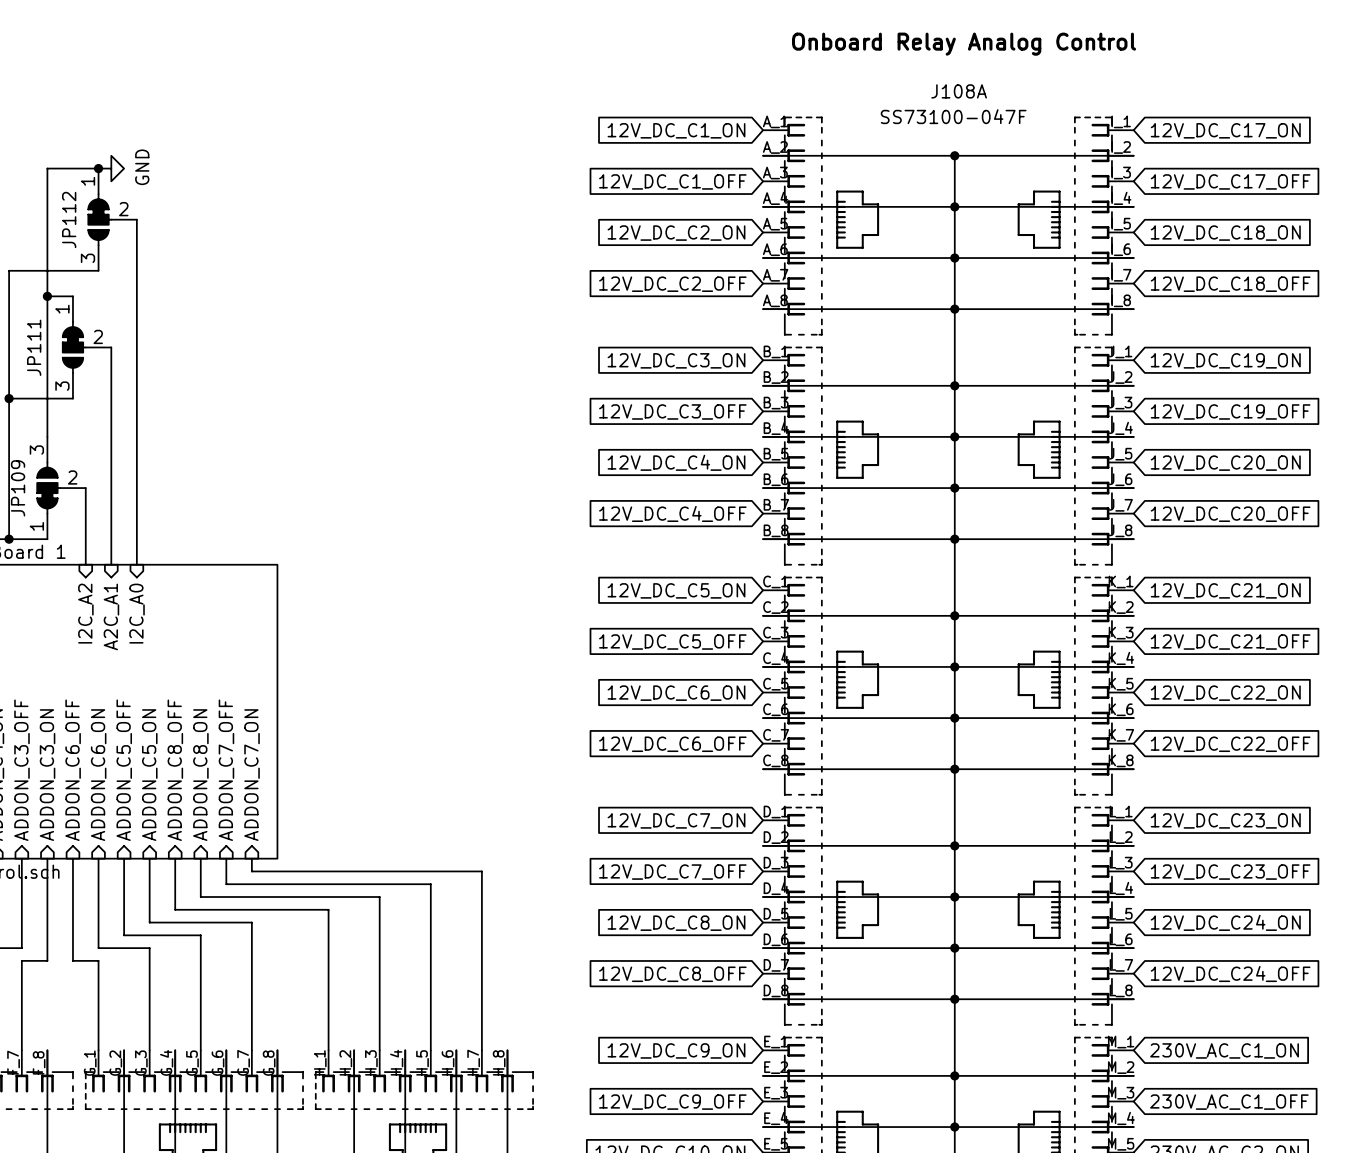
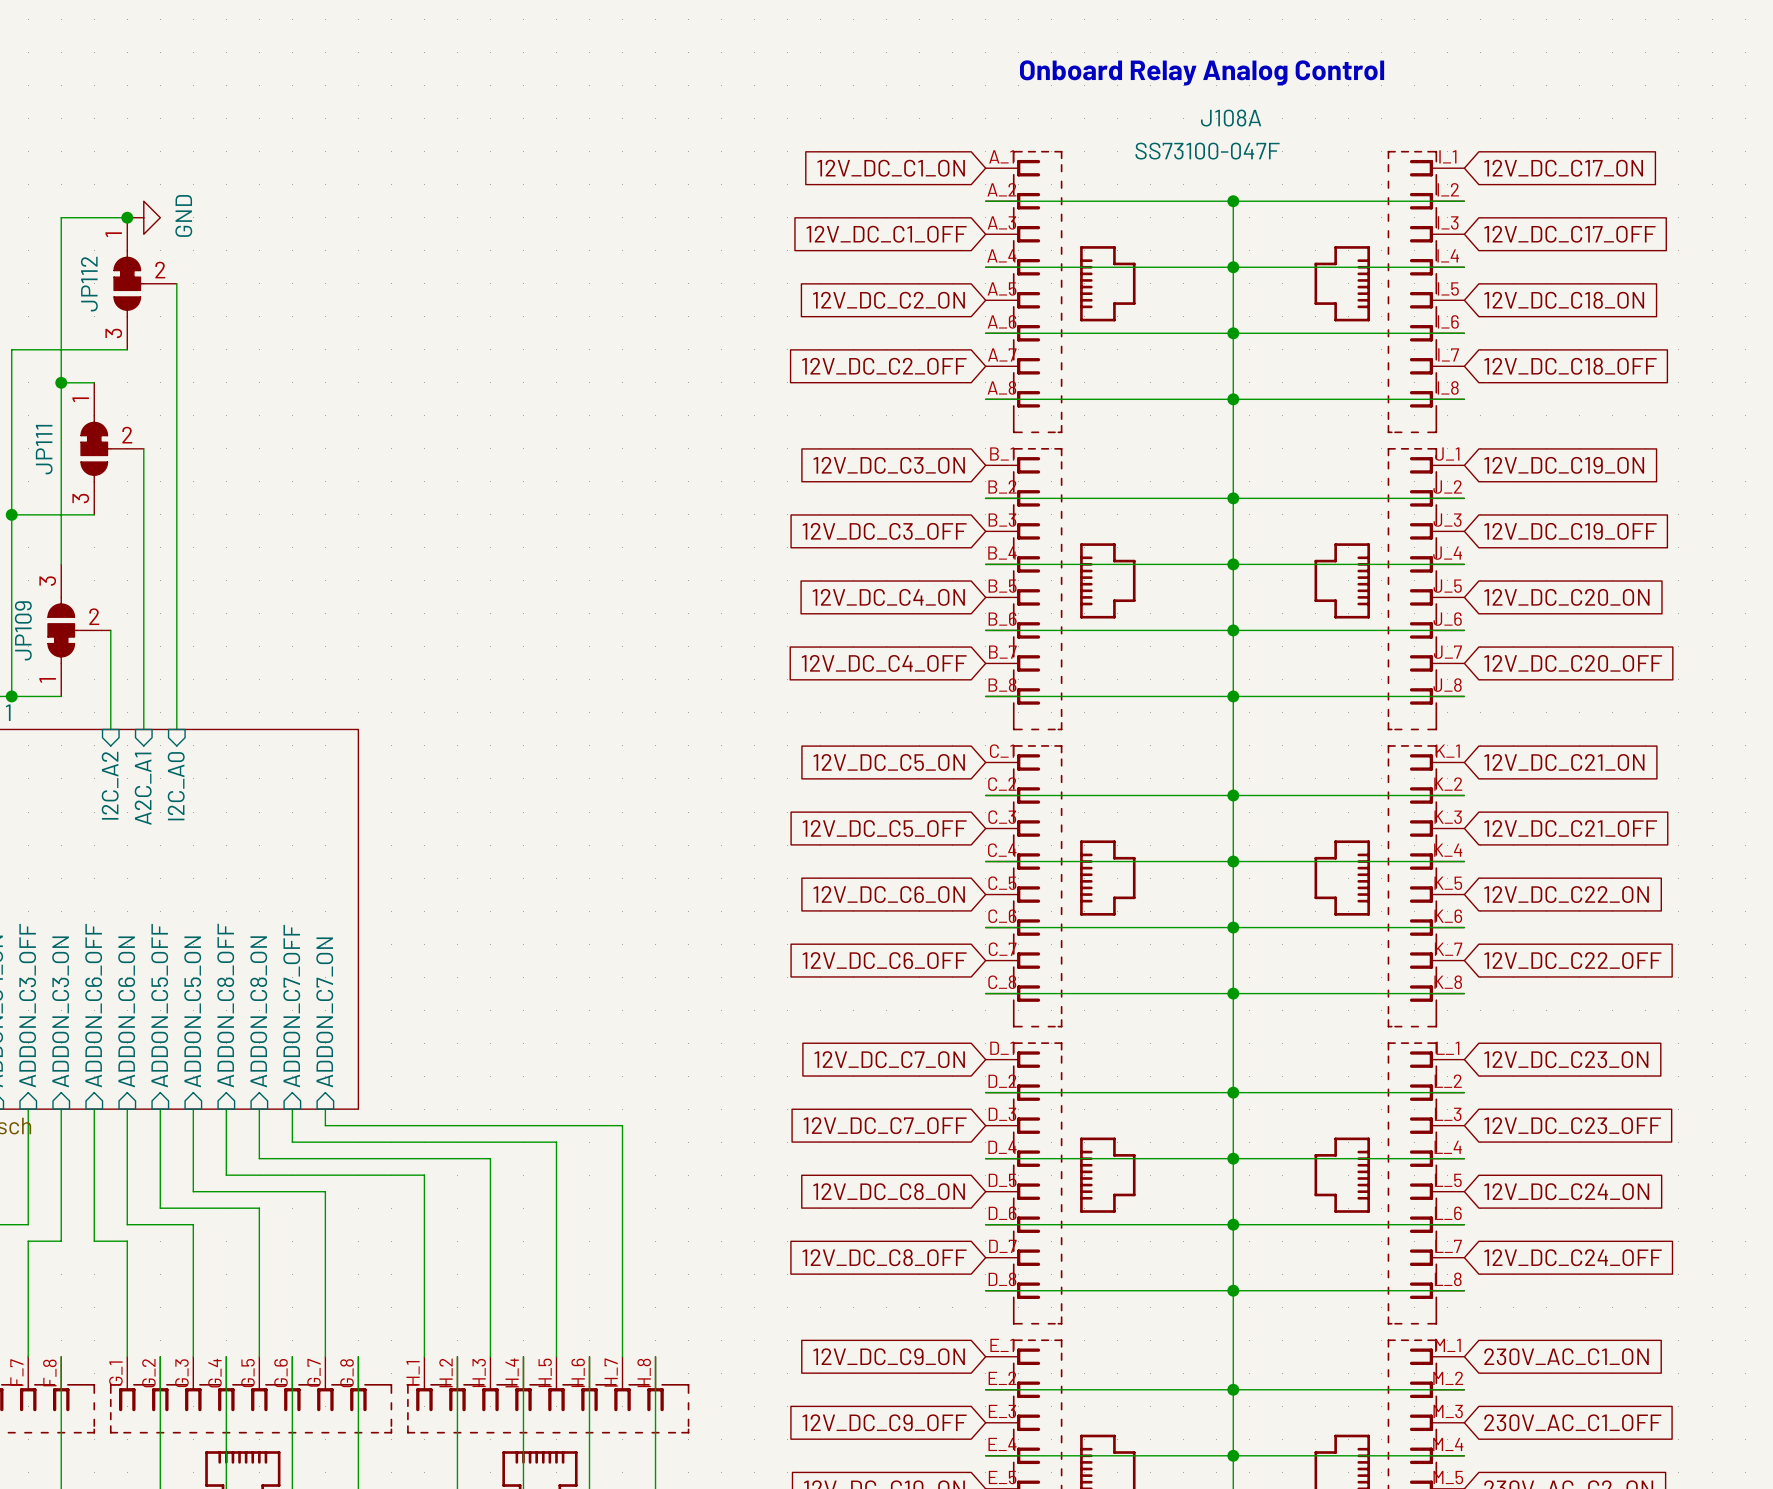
text position: Onboard Relay Analog Control (964, 44) -> Onboard Relay Analog Control (1202, 72)

